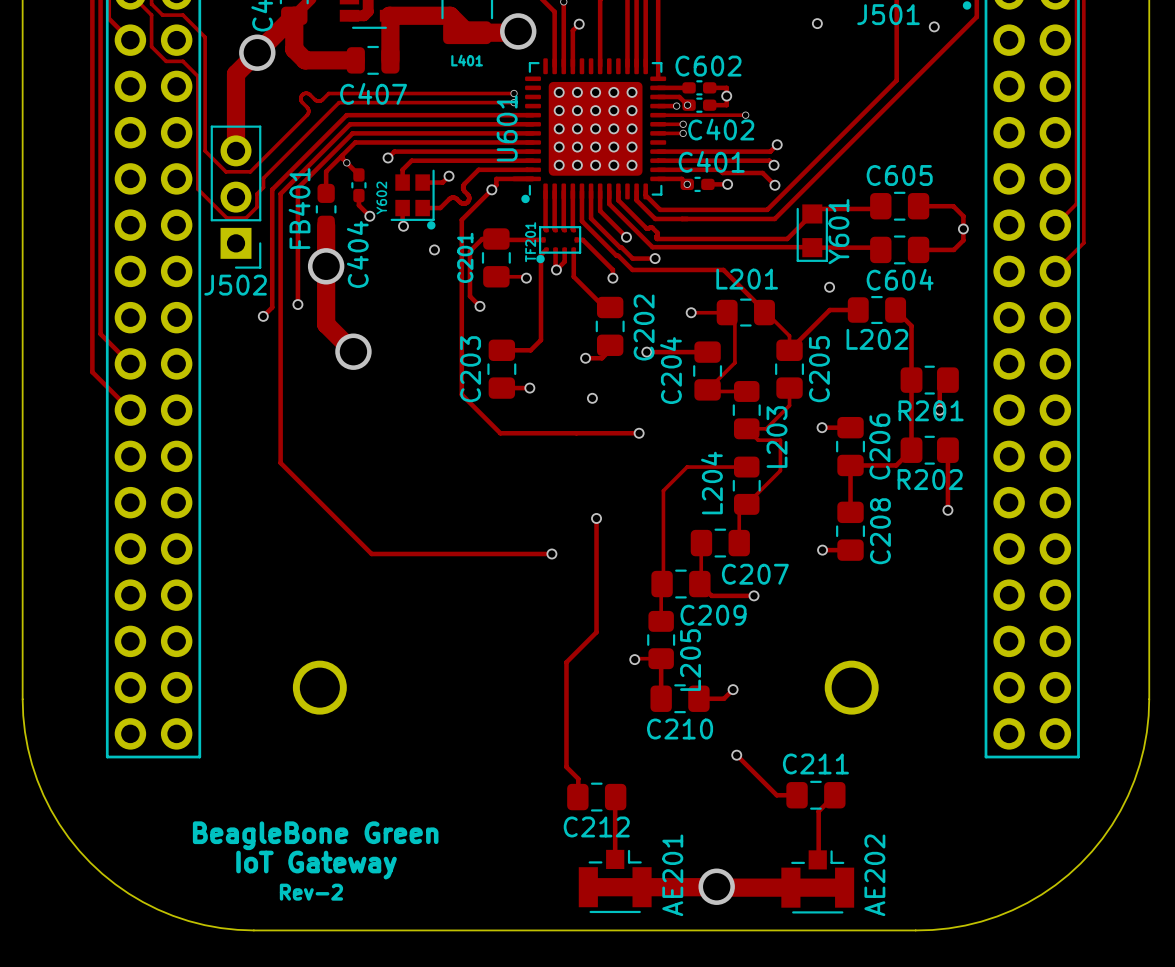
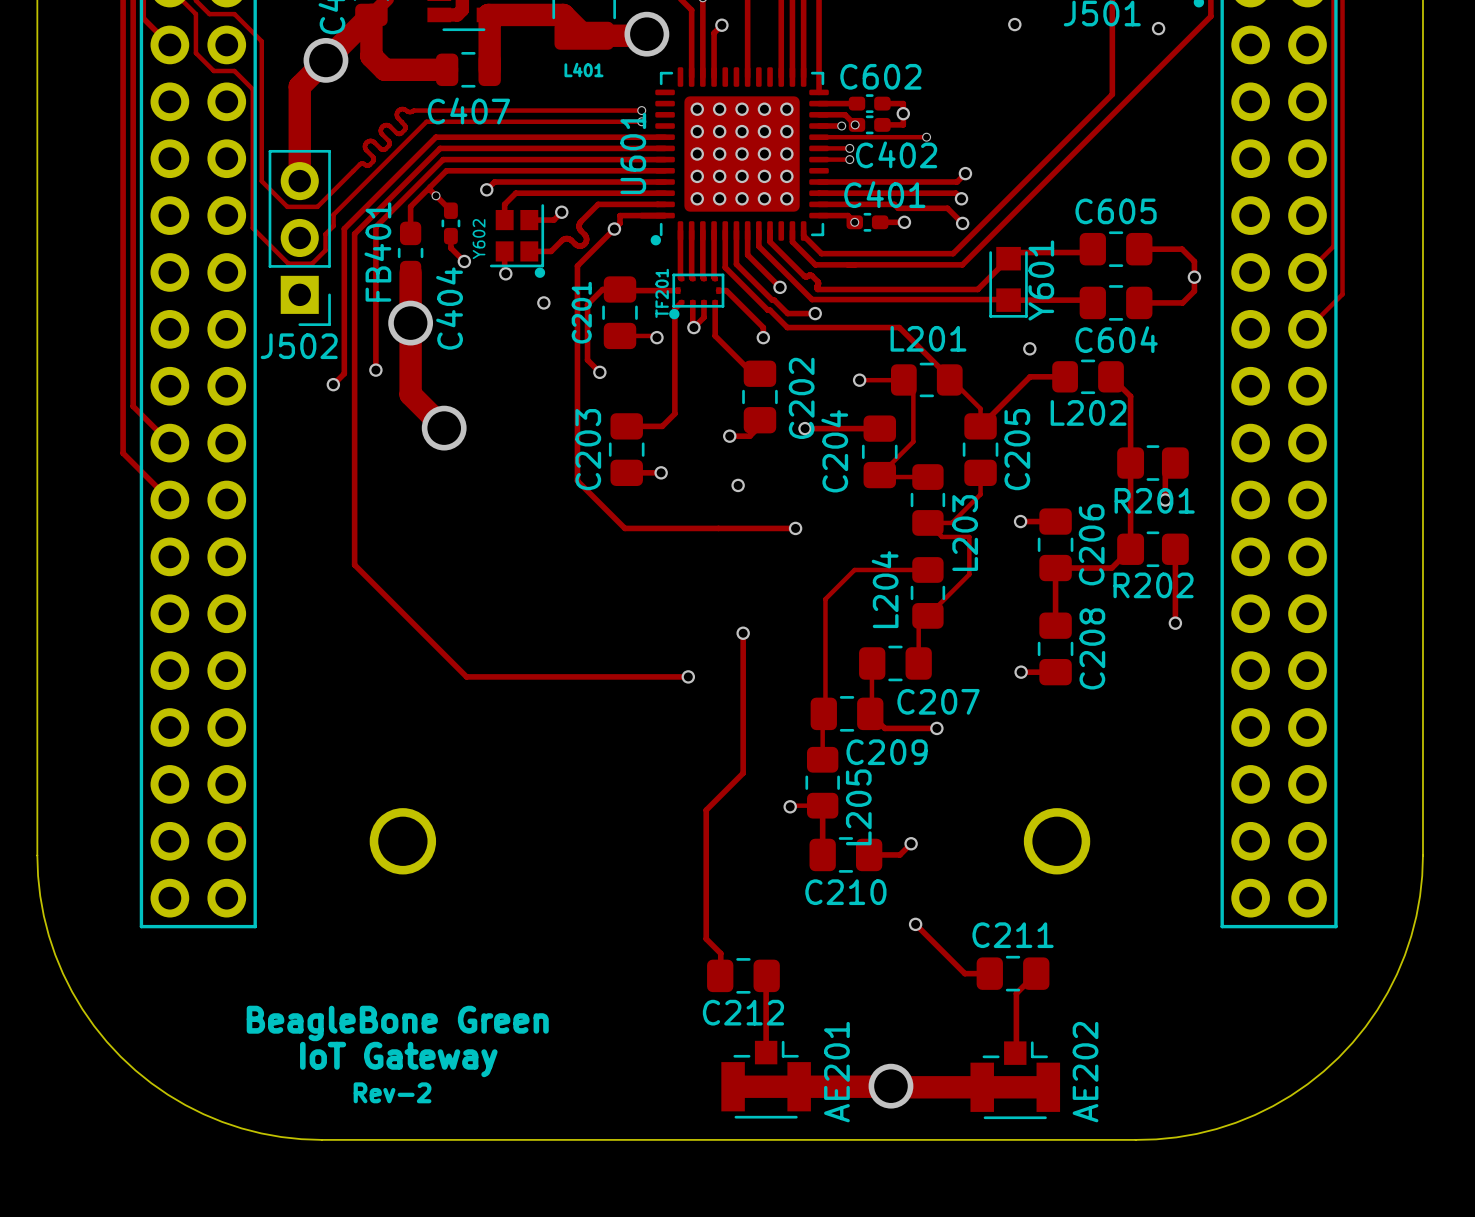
track: (328, 93) (319, 101) (308, 93) (302, 94) (301, 100) (307, 108) (308, 113) (284, 137) -> (401, 122) (405, 127) (400, 133) (397, 133) (388, 125) (381, 127) (381, 133) (389, 143) (385, 149) (381, 149) (372, 141) (366, 142) (365, 148) (373, 157) (373, 160) (368, 165) (359, 164)
track: none -> (413, 110) (409, 112) (401, 109) (398, 110) (397, 116) (402, 122)

